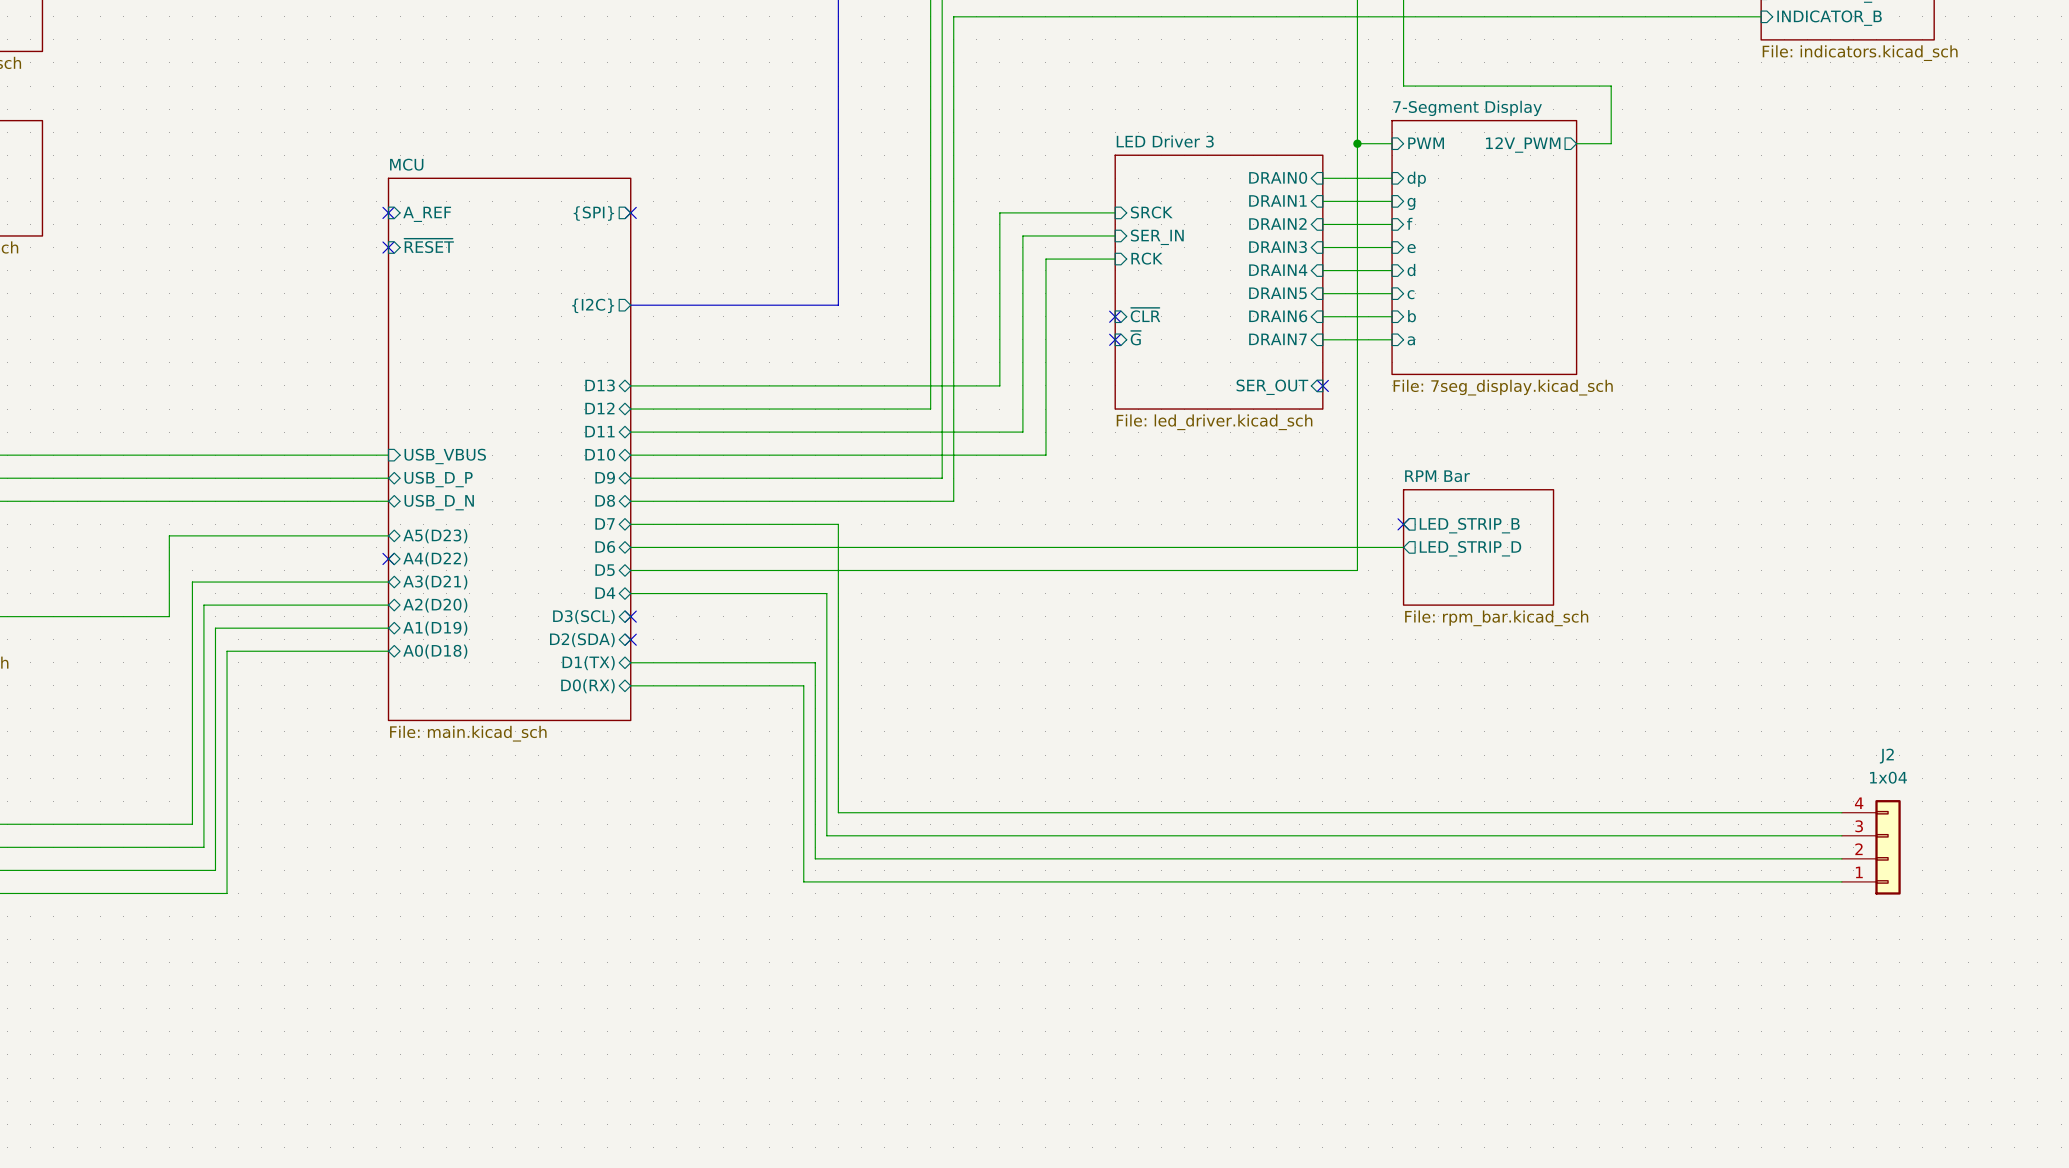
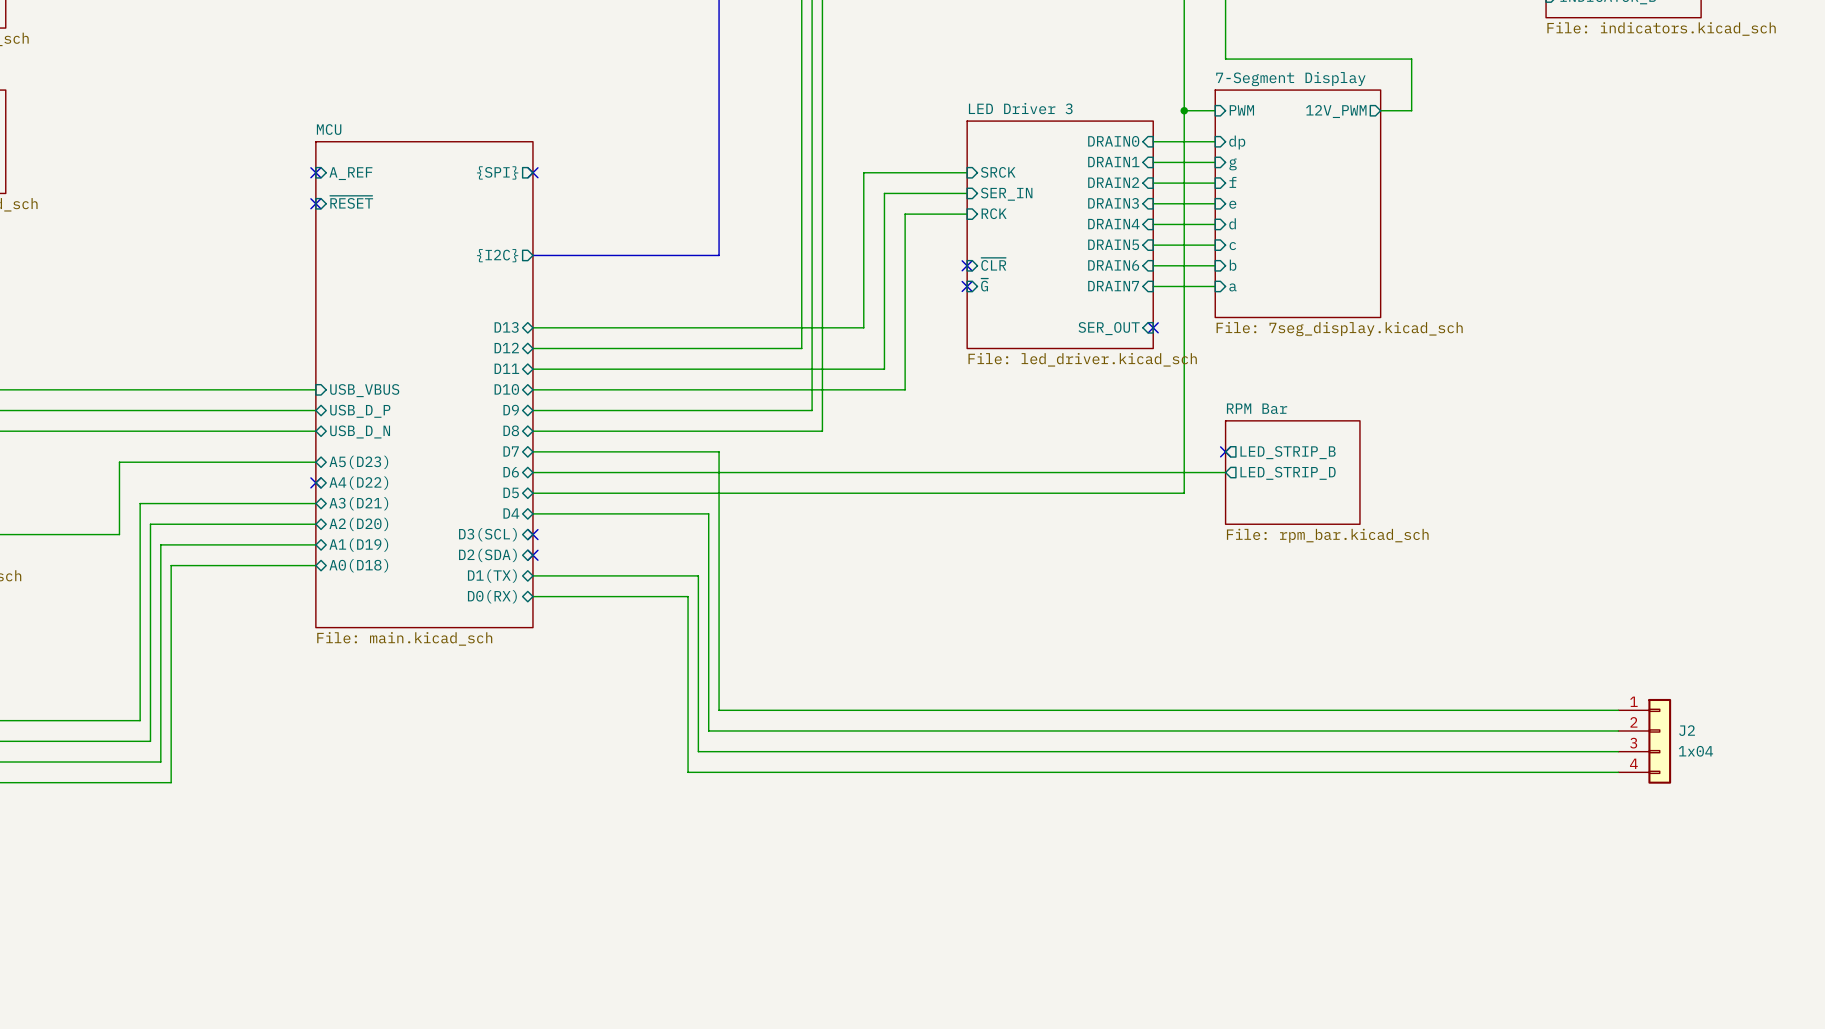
J2 name position: J2 (1886, 756) -> J2 (1687, 730)
J2 text position: 1x04 (1888, 777) -> 1x04 (1695, 751)
J2 flip: as is (1888, 847) -> up-down (1659, 741)

